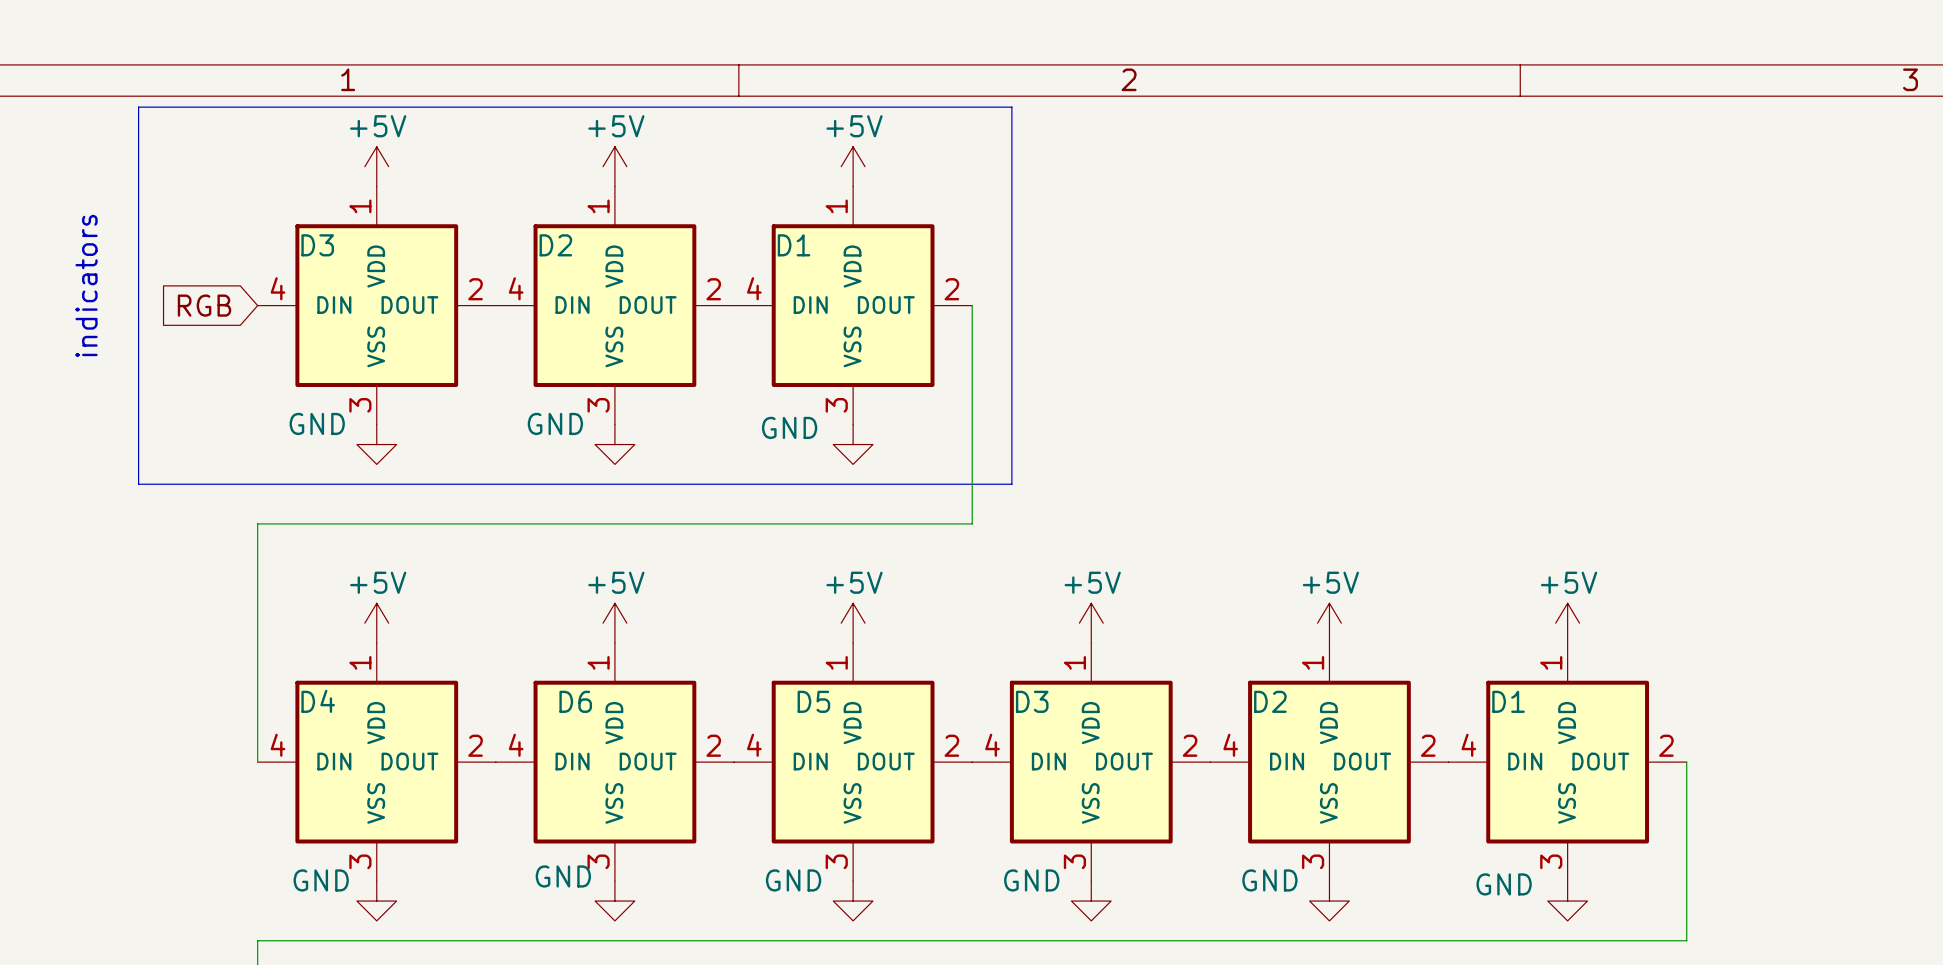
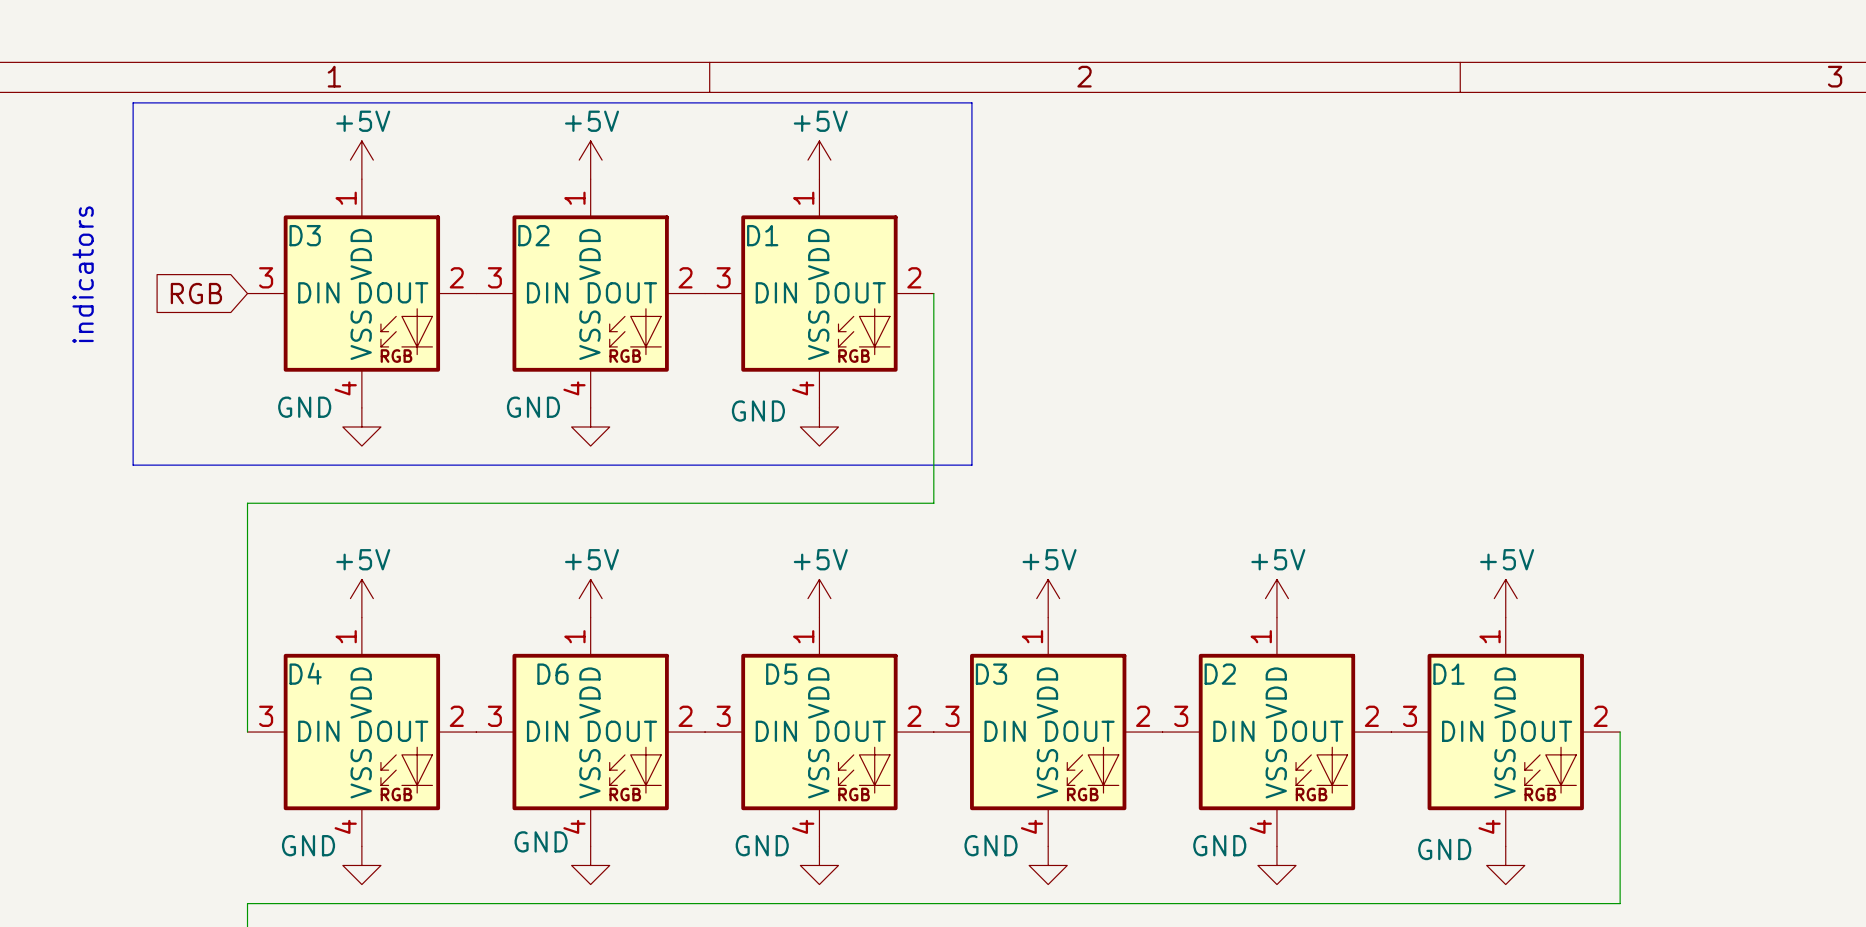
D3 symbol: [257, 186, 496, 425] -> [247, 179, 477, 408]
D2 symbol: [495, 186, 735, 425] -> [476, 179, 706, 408]
D1 symbol: [734, 186, 973, 425] -> [705, 179, 934, 408]
D4 symbol: [257, 643, 496, 882] -> [247, 617, 477, 847]
D6 symbol: [495, 643, 735, 882] -> [476, 617, 706, 847]
D5 symbol: [734, 643, 973, 882] -> [705, 617, 934, 847]
D3 symbol: [972, 643, 1211, 882] -> [933, 617, 1163, 847]
D2 symbol: [1210, 643, 1449, 882] -> [1162, 617, 1392, 847]
D1 symbol: [1448, 643, 1687, 882] -> [1391, 617, 1621, 847]

